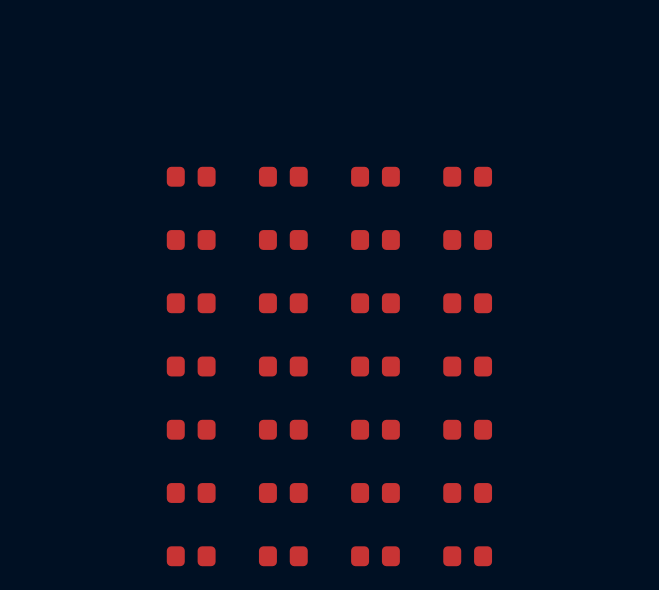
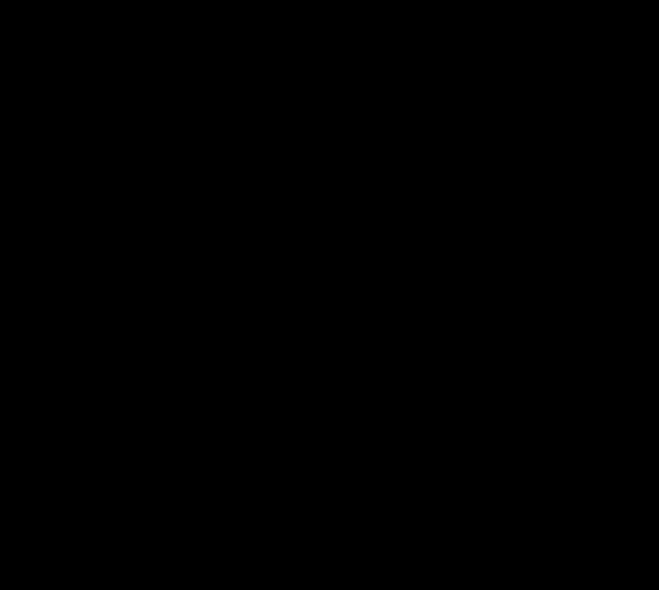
part: (191, 176) -> none
part: (283, 176) -> none
part: (375, 176) -> none
part: (467, 176) -> none
part: (191, 240) -> none
part: (283, 240) -> none
part: (375, 240) -> none
part: (467, 240) -> none
part: (191, 303) -> none
part: (283, 303) -> none
part: (375, 303) -> none
part: (467, 303) -> none
part: (191, 366) -> none
part: (283, 366) -> none
part: (375, 366) -> none
part: (467, 366) -> none
part: (191, 429) -> none
part: (283, 429) -> none
part: (375, 429) -> none
part: (467, 429) -> none
part: (191, 493) -> none
part: (283, 493) -> none
part: (375, 493) -> none
part: (467, 493) -> none
part: (191, 556) -> none
part: (283, 556) -> none
part: (375, 556) -> none
part: (467, 556) -> none

